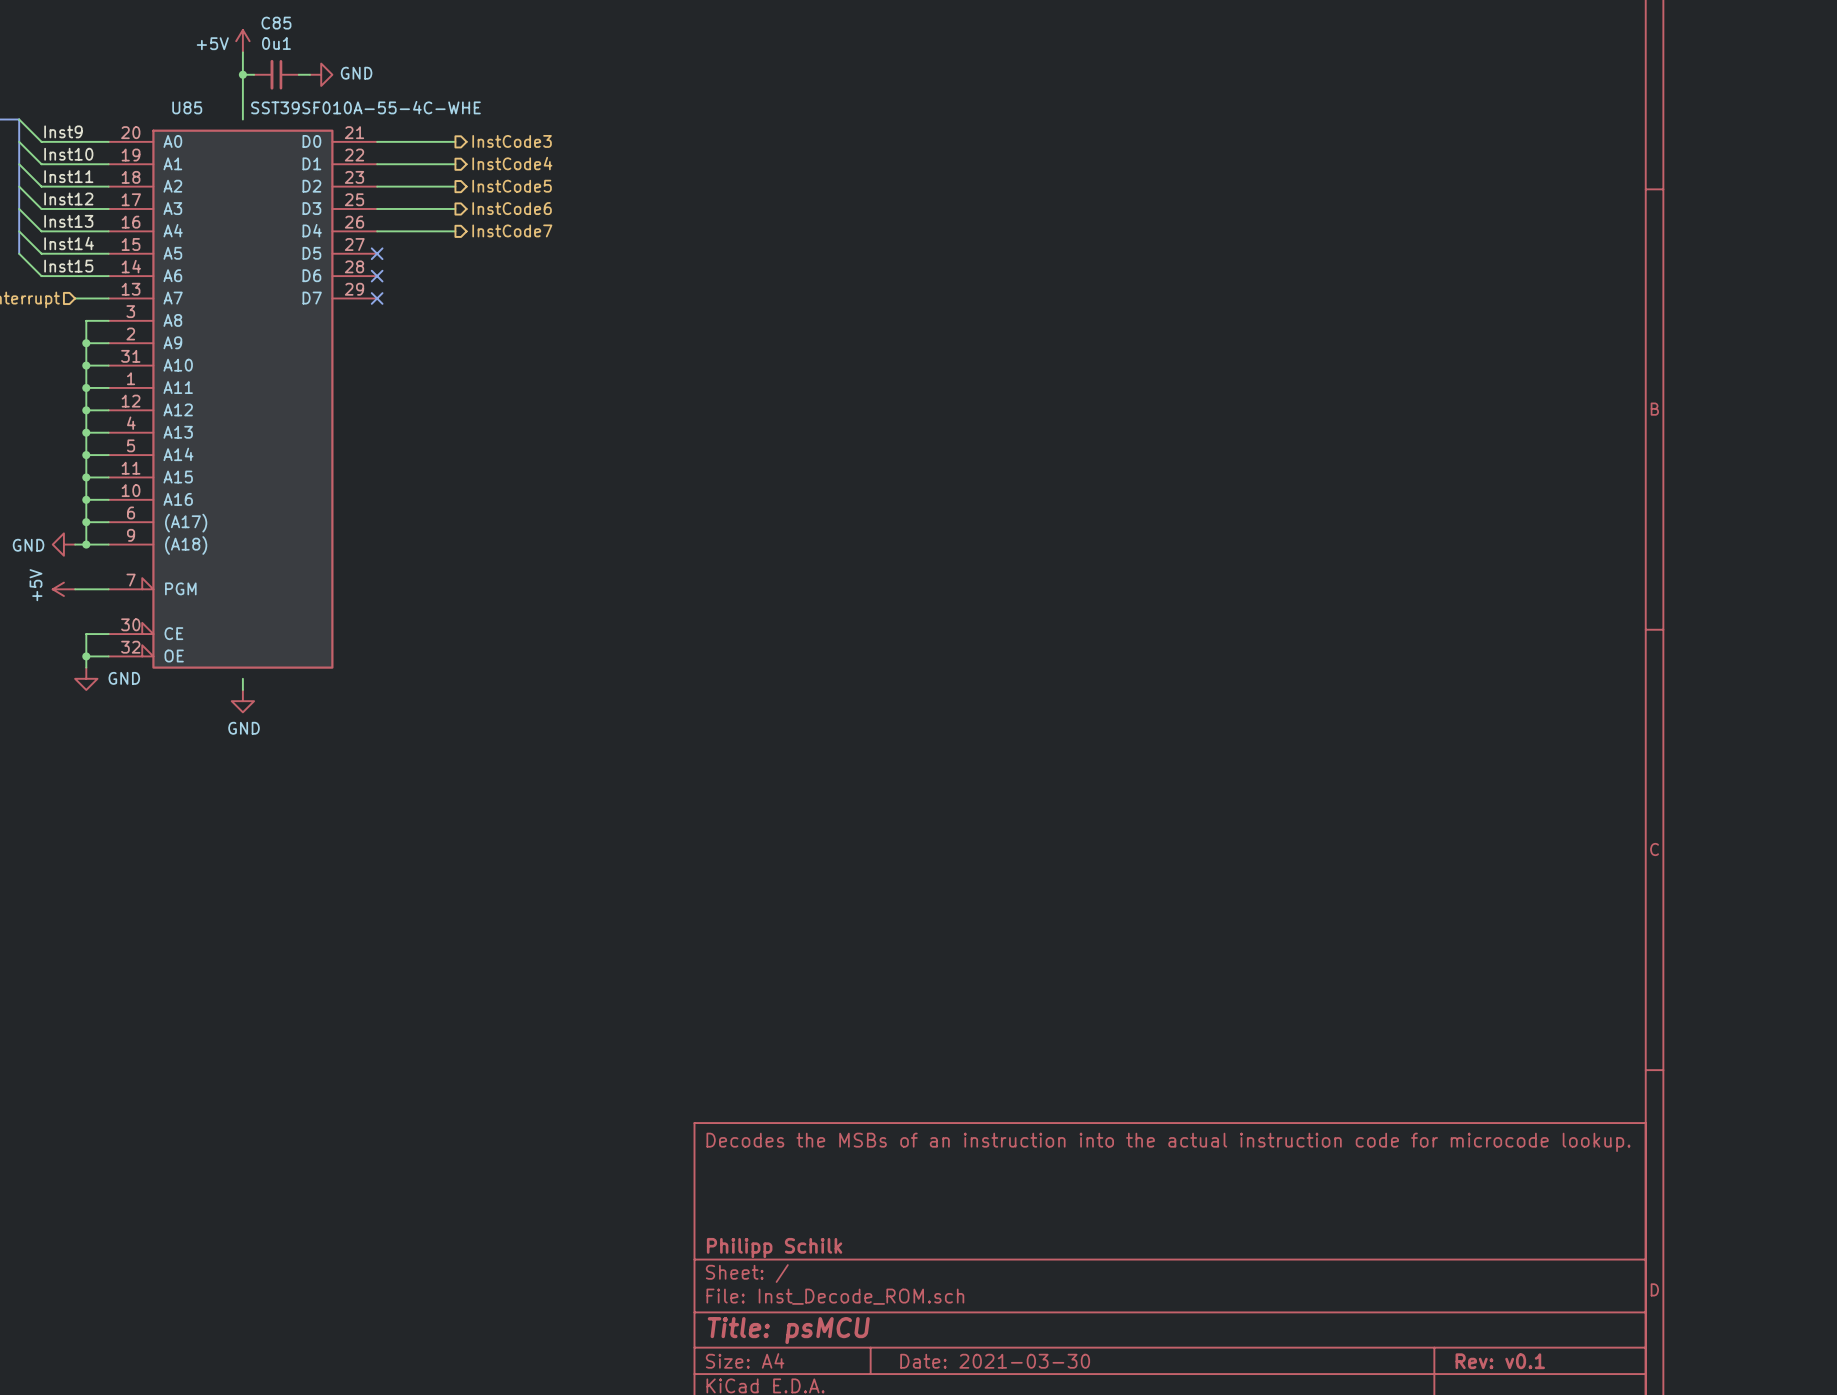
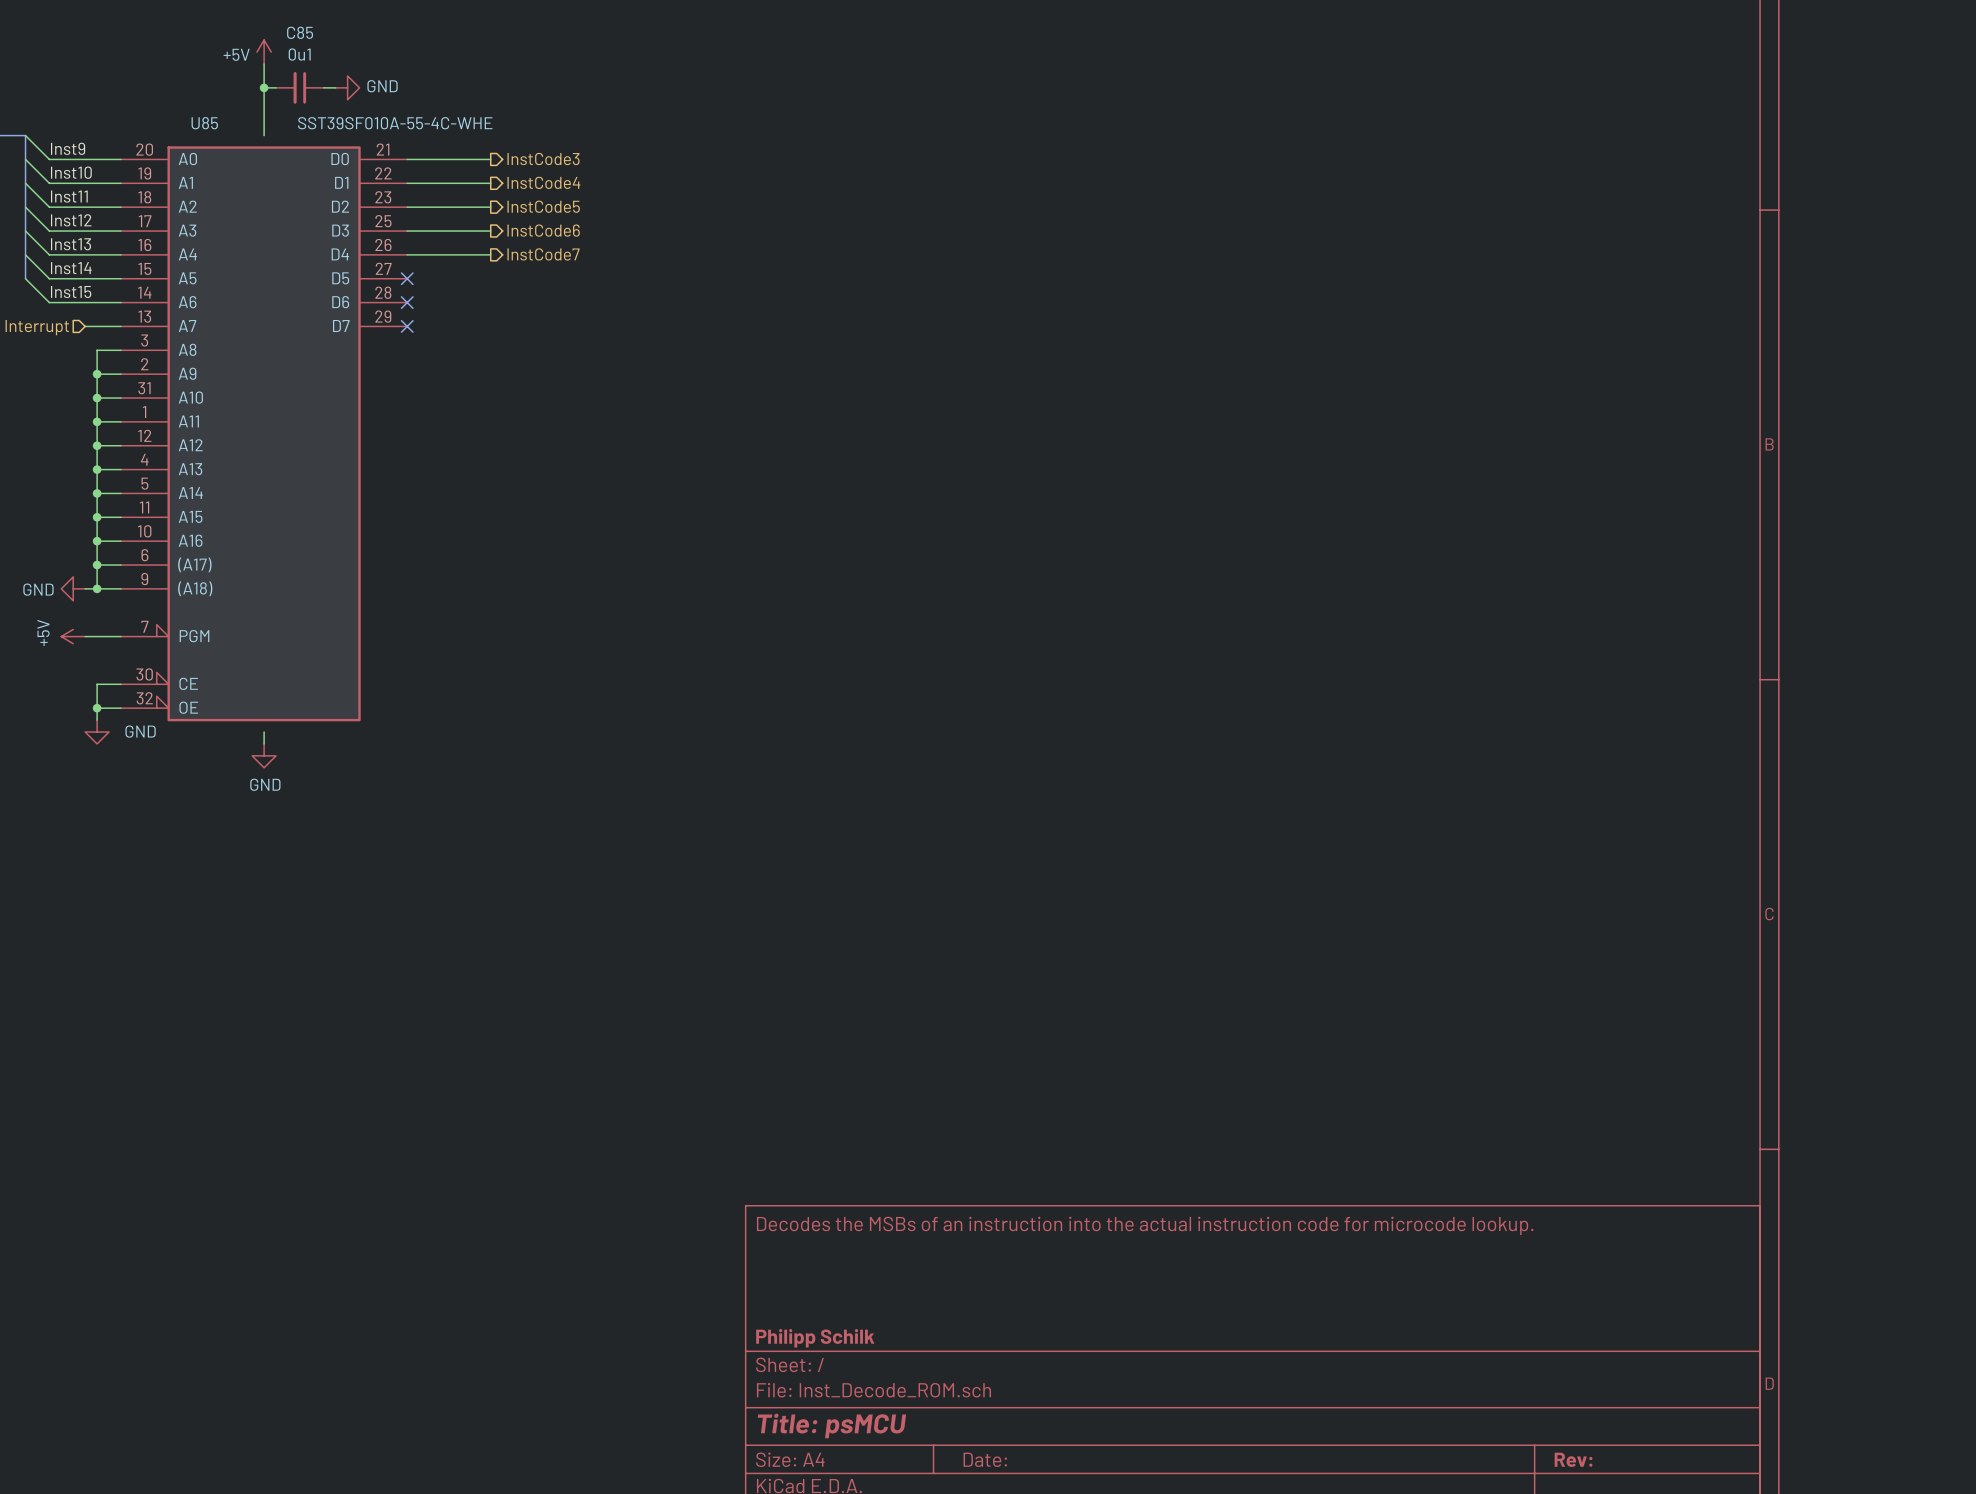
title block: Date: 2021-03-30 (995, 1361) -> Date: (985, 1459)
title block: Rev: v0.1 (1500, 1361) -> Rev: (1573, 1459)

